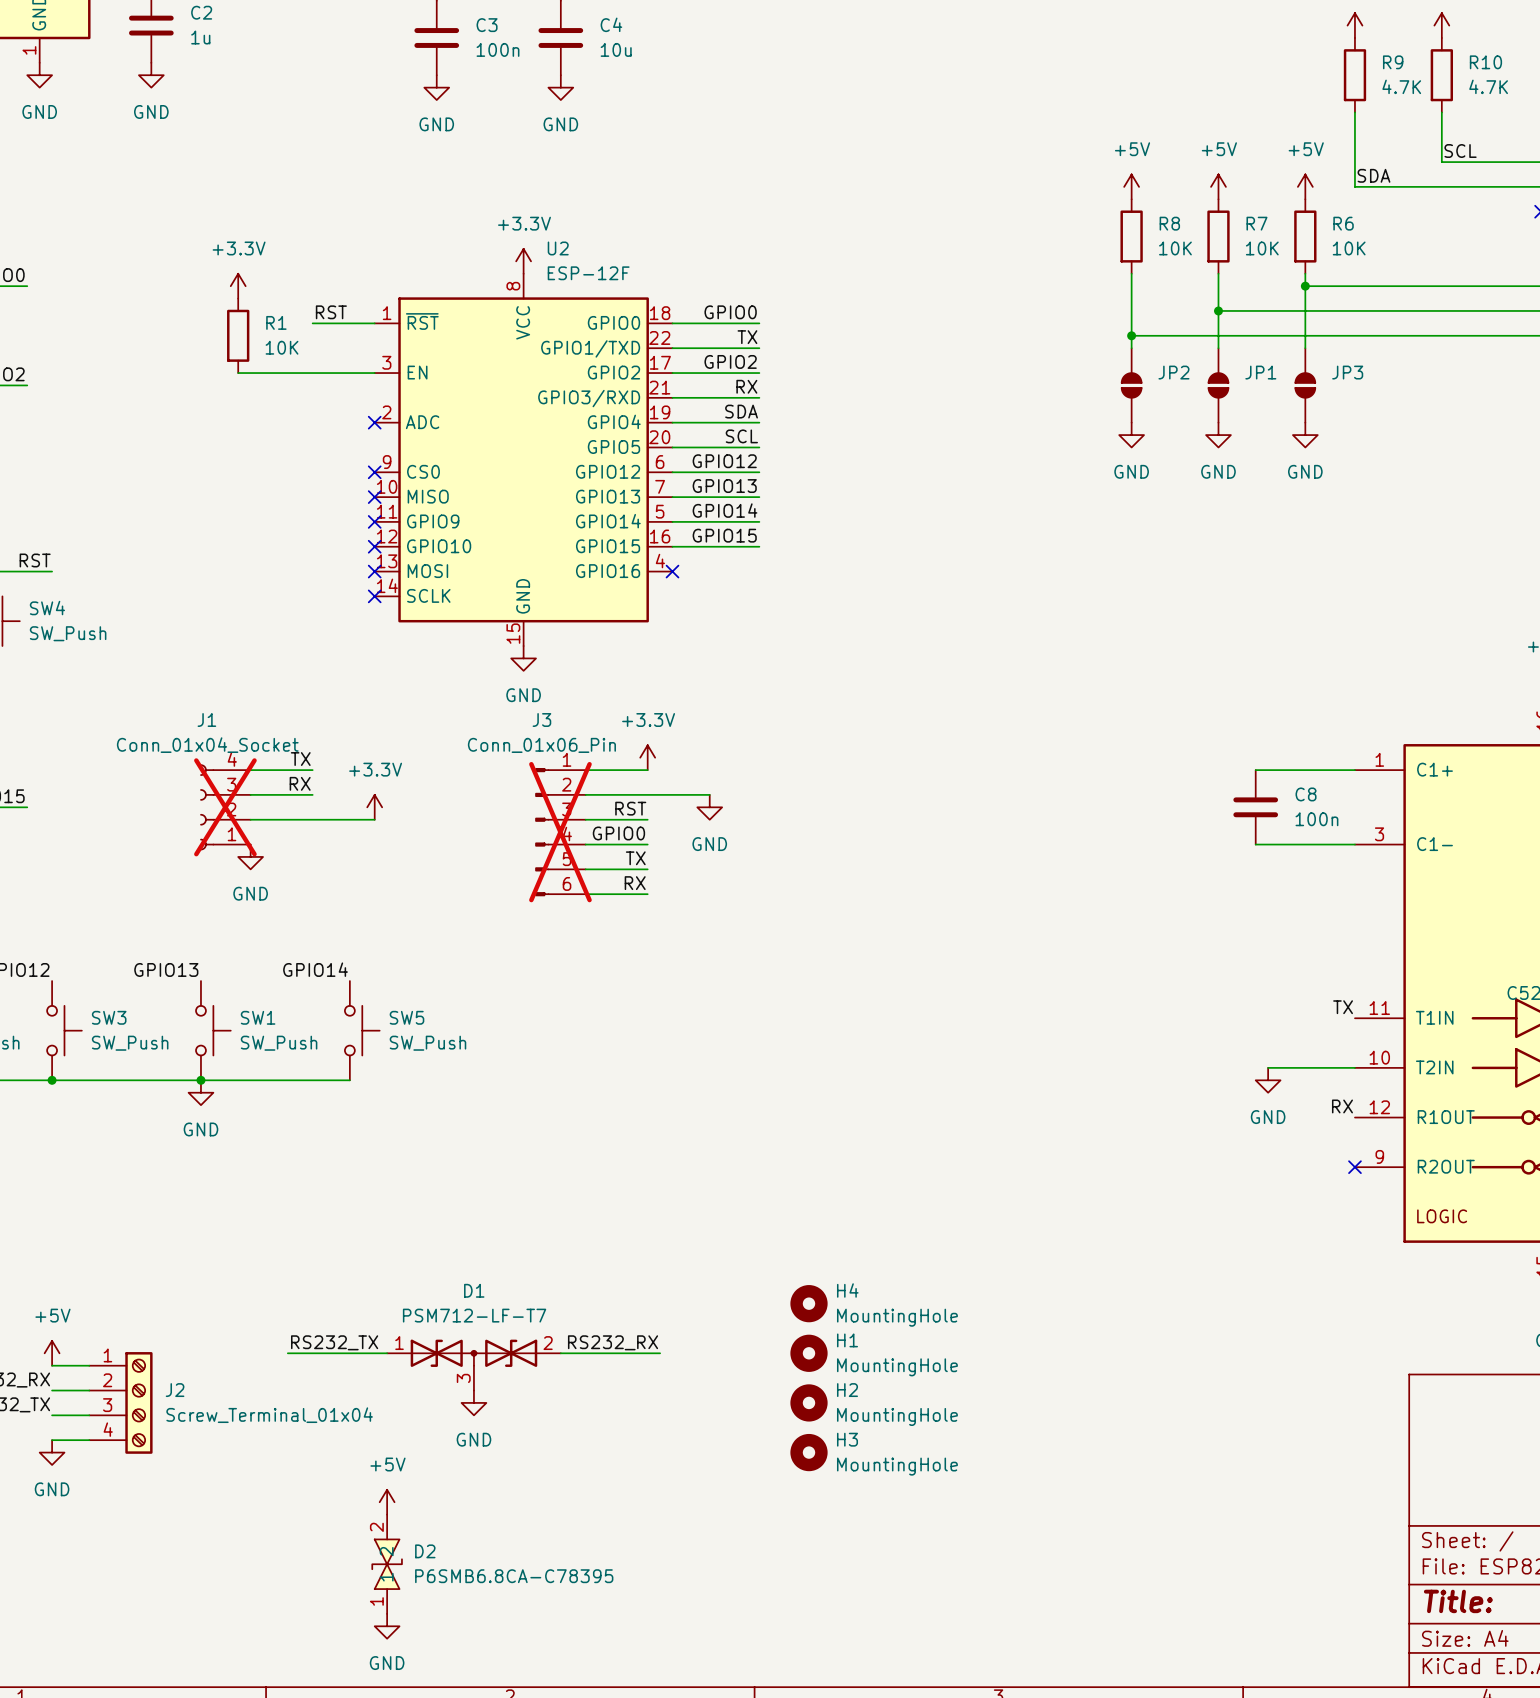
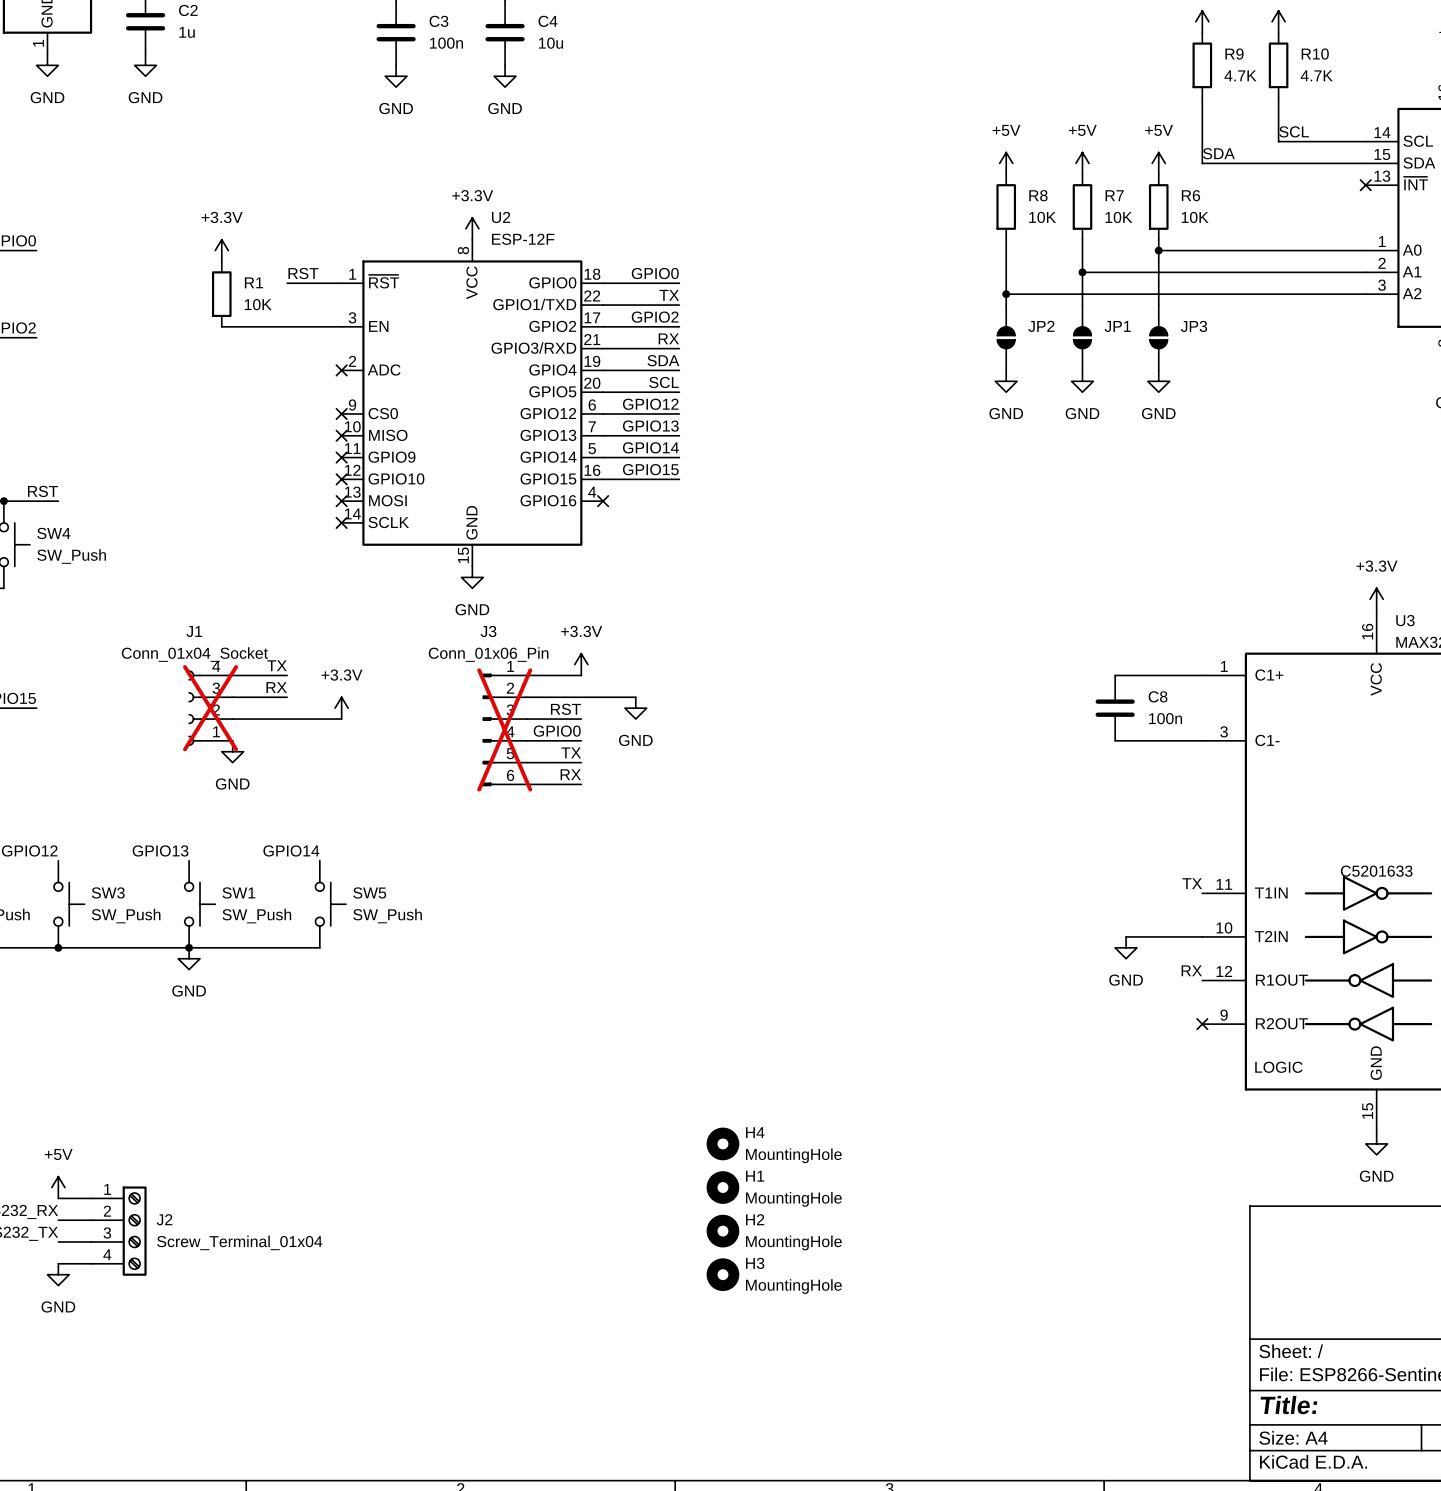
label: RS232_TX (334, 1342) -> none
label: RS232_RX (613, 1342) -> none
wire: (287, 1353) (387, 1353) -> none
wire: (560, 1353) (660, 1353) -> none
D1: PSM712-LF-T7 (473, 1365) -> none
power symbol: GND (473, 1402) -> none
power symbol: +5V (387, 1502) -> none
D2: P6SMB6.8CA-C78395 (387, 1564) -> none
power symbol: GND (387, 1626) -> none

